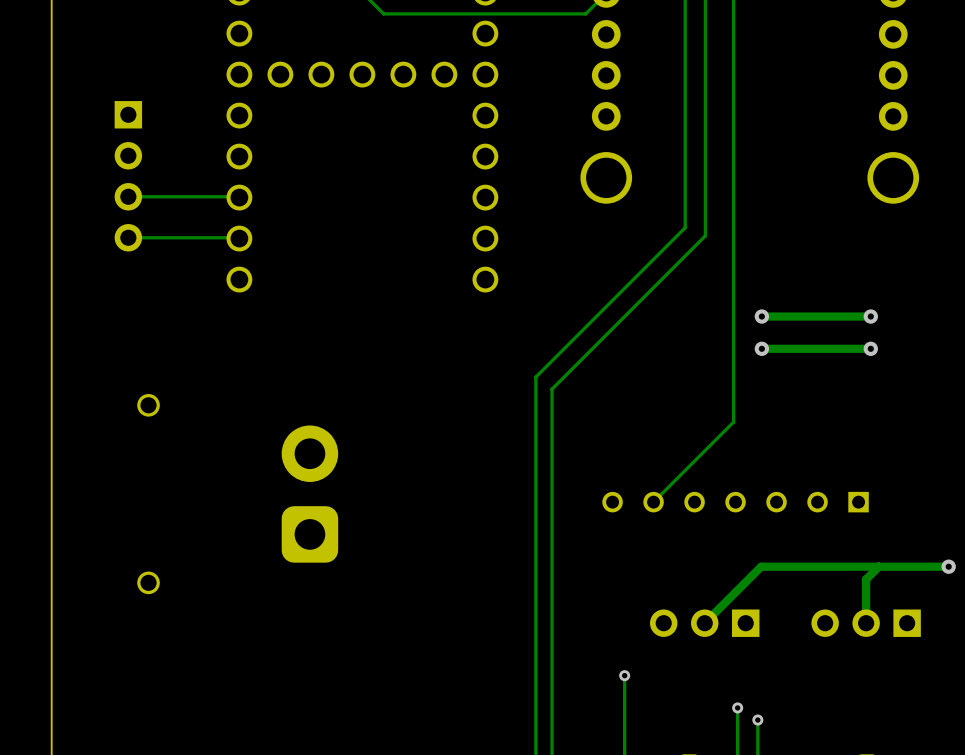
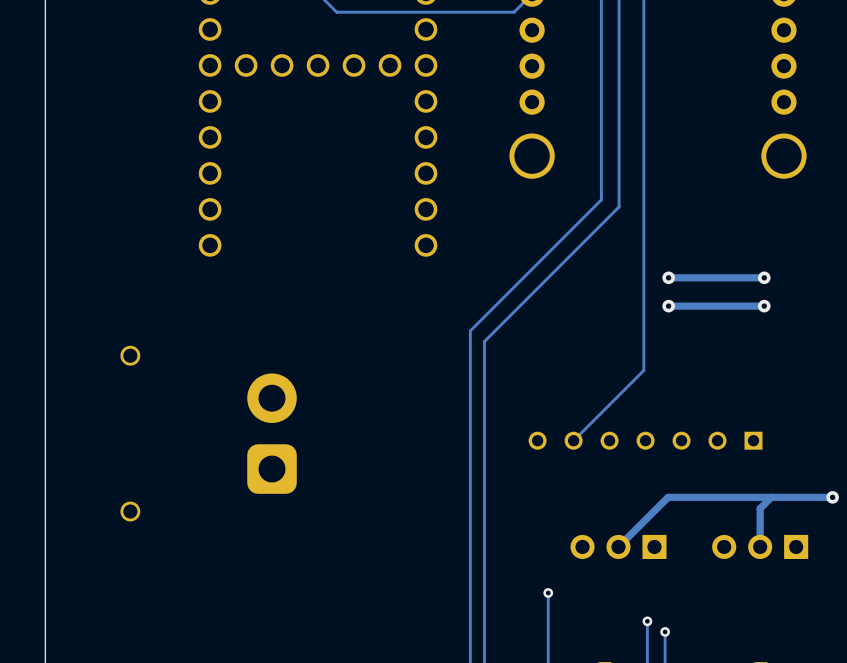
part: (128, 176) -> none
track: (238, 196) (128, 196) -> none
track: (238, 237) (128, 237) -> none

